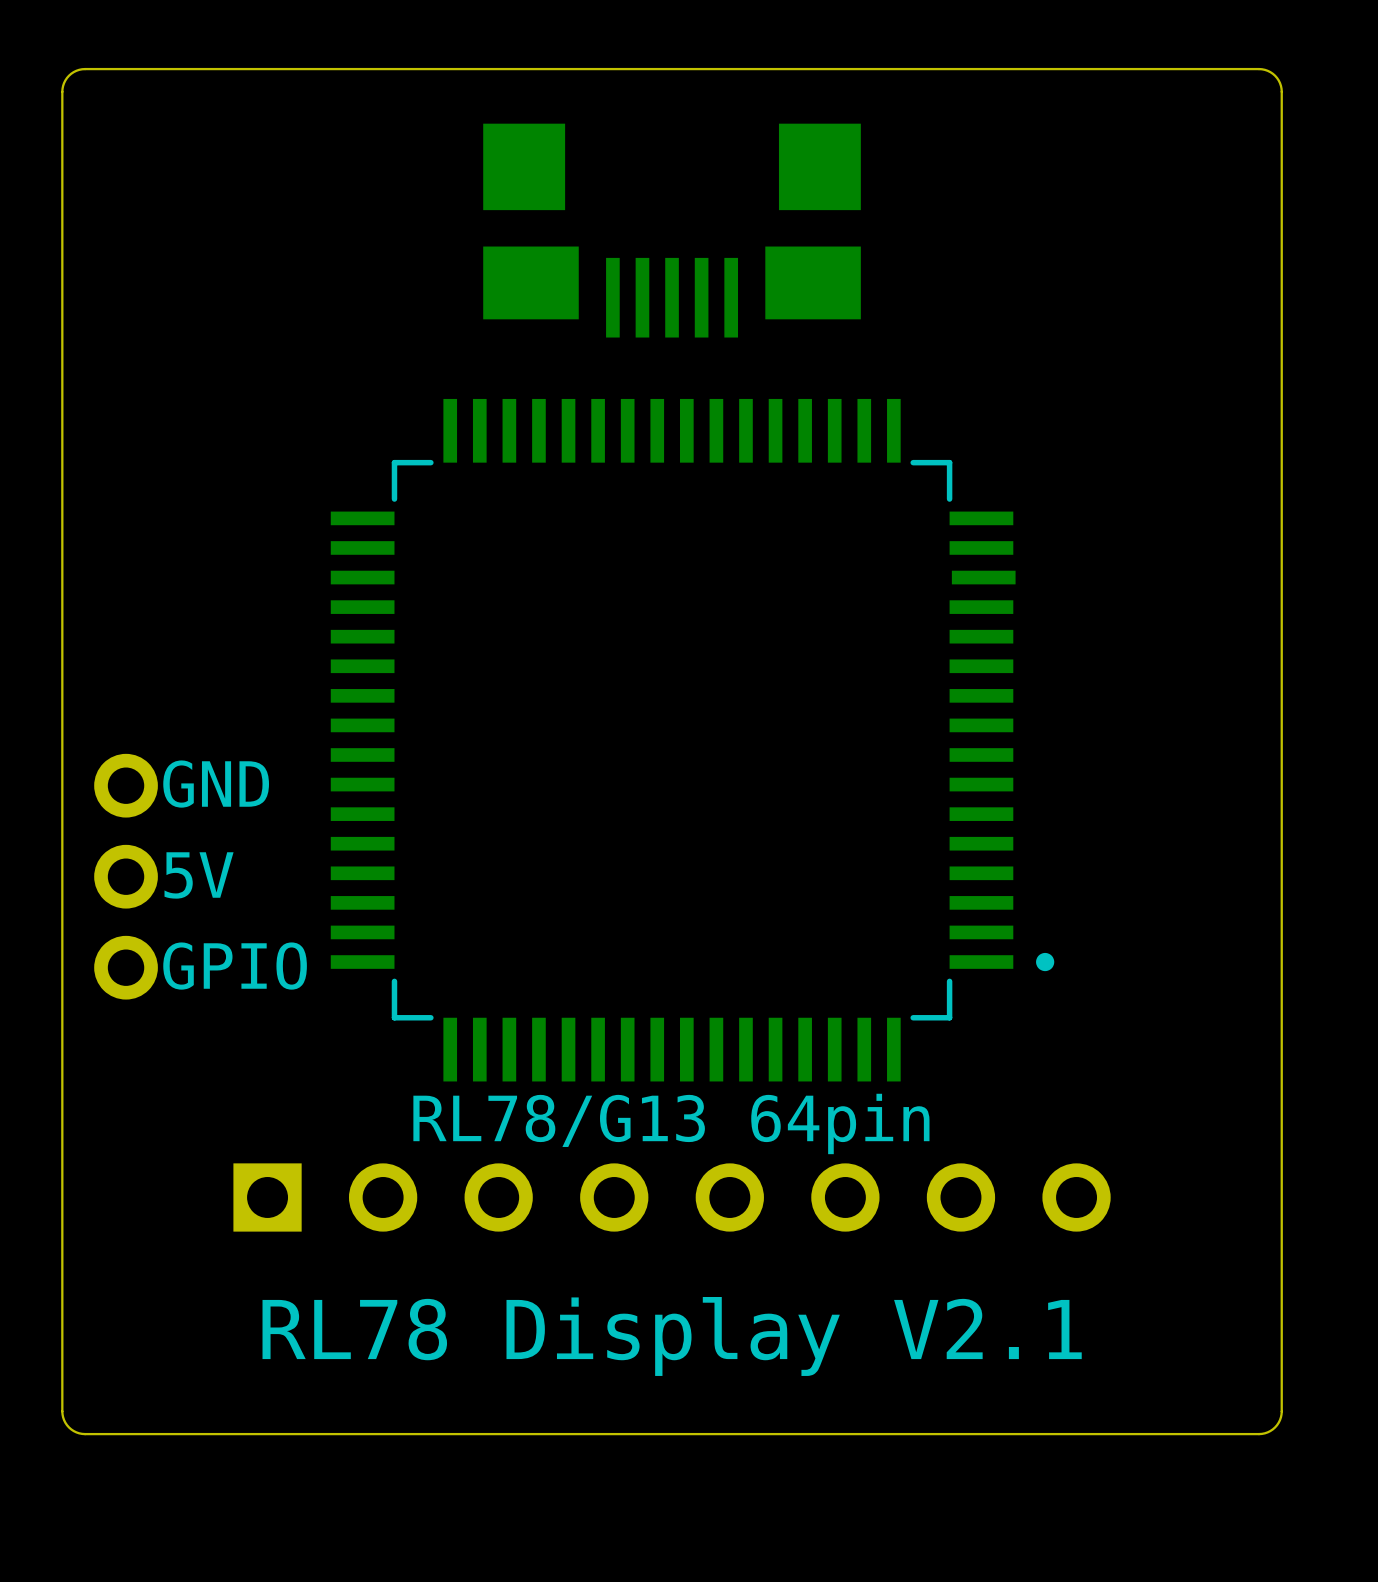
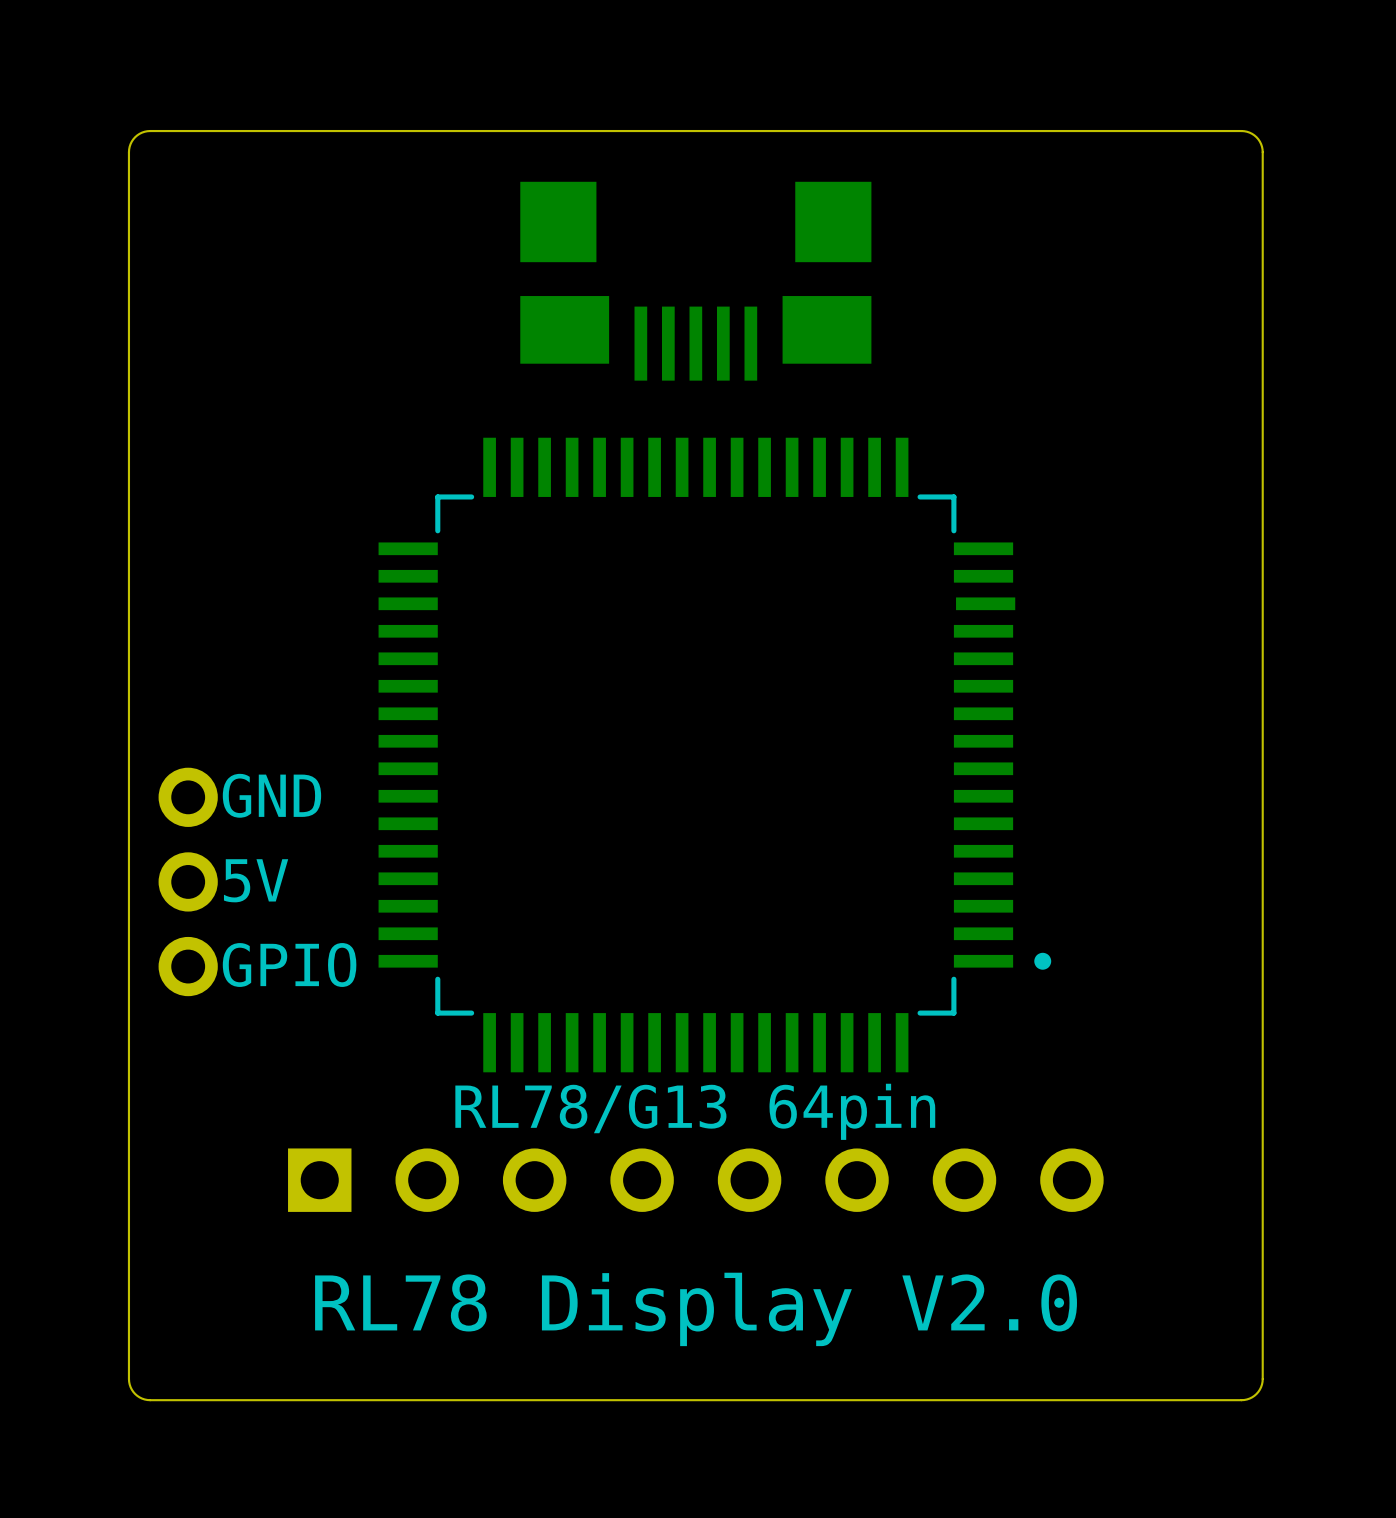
text: RL78 Display V2.1 (672, 1336) -> RL78 Display V2.0 (696, 1309)

